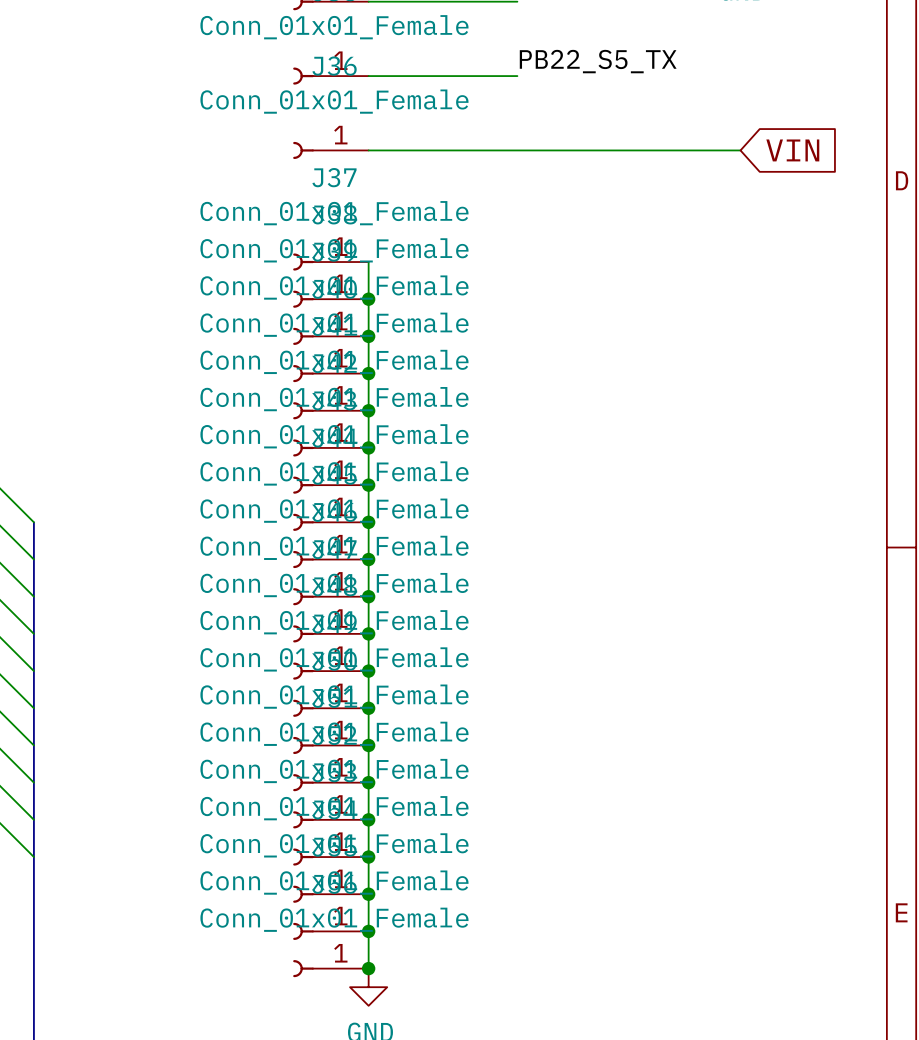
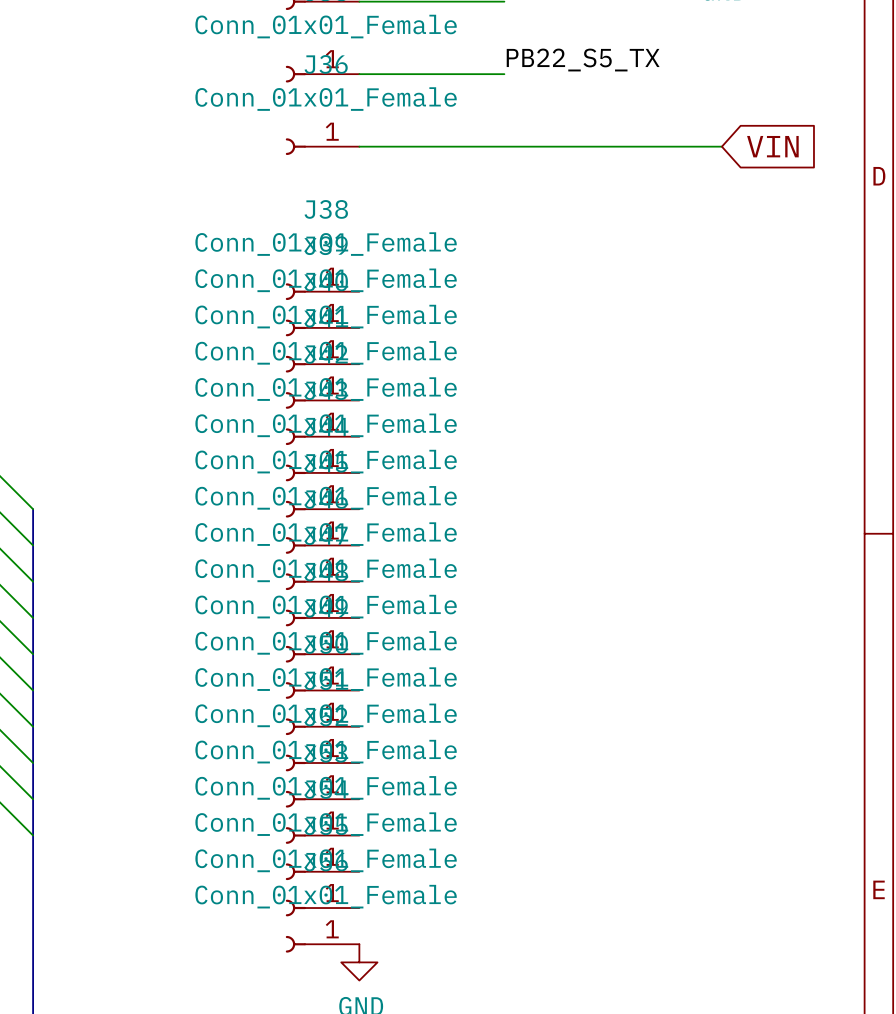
J37: Conn_01x01_Female (330, 262) -> none
wire: (368, 262) (368, 968) -> none
junction: (368, 299) -> none
junction: (368, 336) -> none
junction: (368, 373) -> none
junction: (368, 410) -> none
junction: (368, 447) -> none
junction: (368, 485) -> none
junction: (368, 522) -> none
junction: (368, 559) -> none
junction: (368, 596) -> none
junction: (368, 633) -> none
junction: (368, 671) -> none
junction: (368, 708) -> none
junction: (368, 745) -> none
junction: (368, 782) -> none
junction: (368, 819) -> none
junction: (368, 857) -> none
junction: (368, 894) -> none
junction: (368, 931) -> none
junction: (368, 968) -> none

